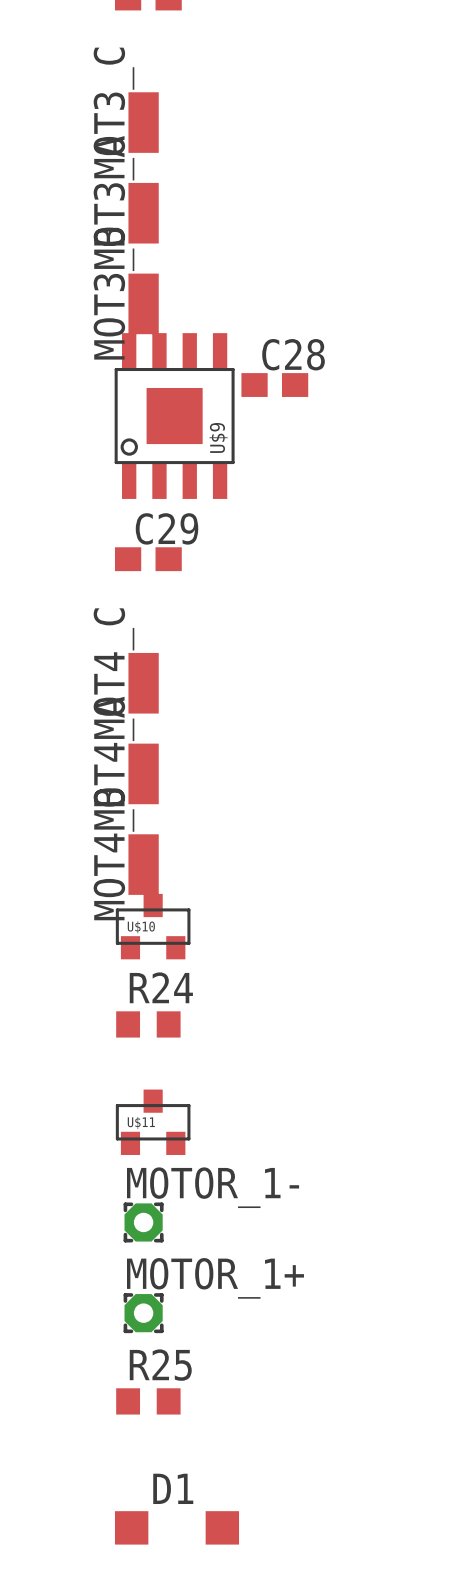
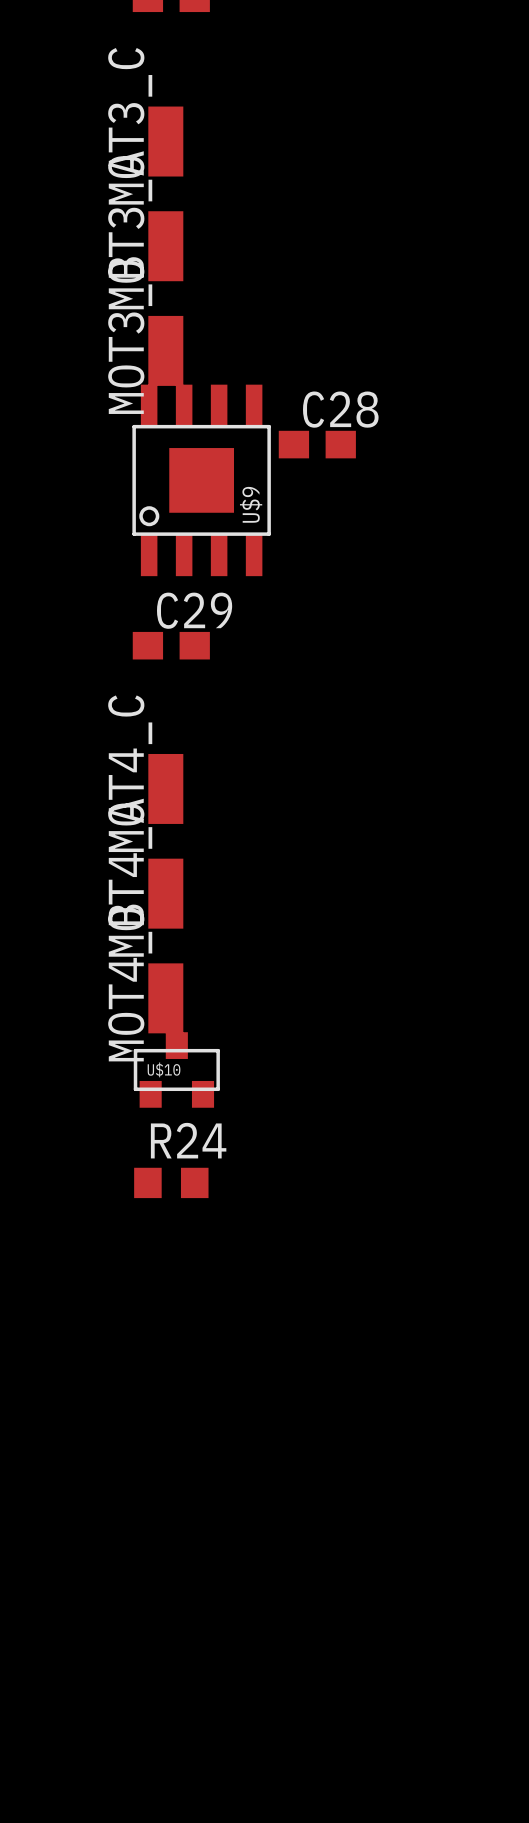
U$11: (153, 1122) -> none
MOTOR_1-: (143, 1222) -> none
MOTOR_1+: (143, 1313) -> none
R25: (148, 1401) -> none
D1: (177, 1527) -> none

